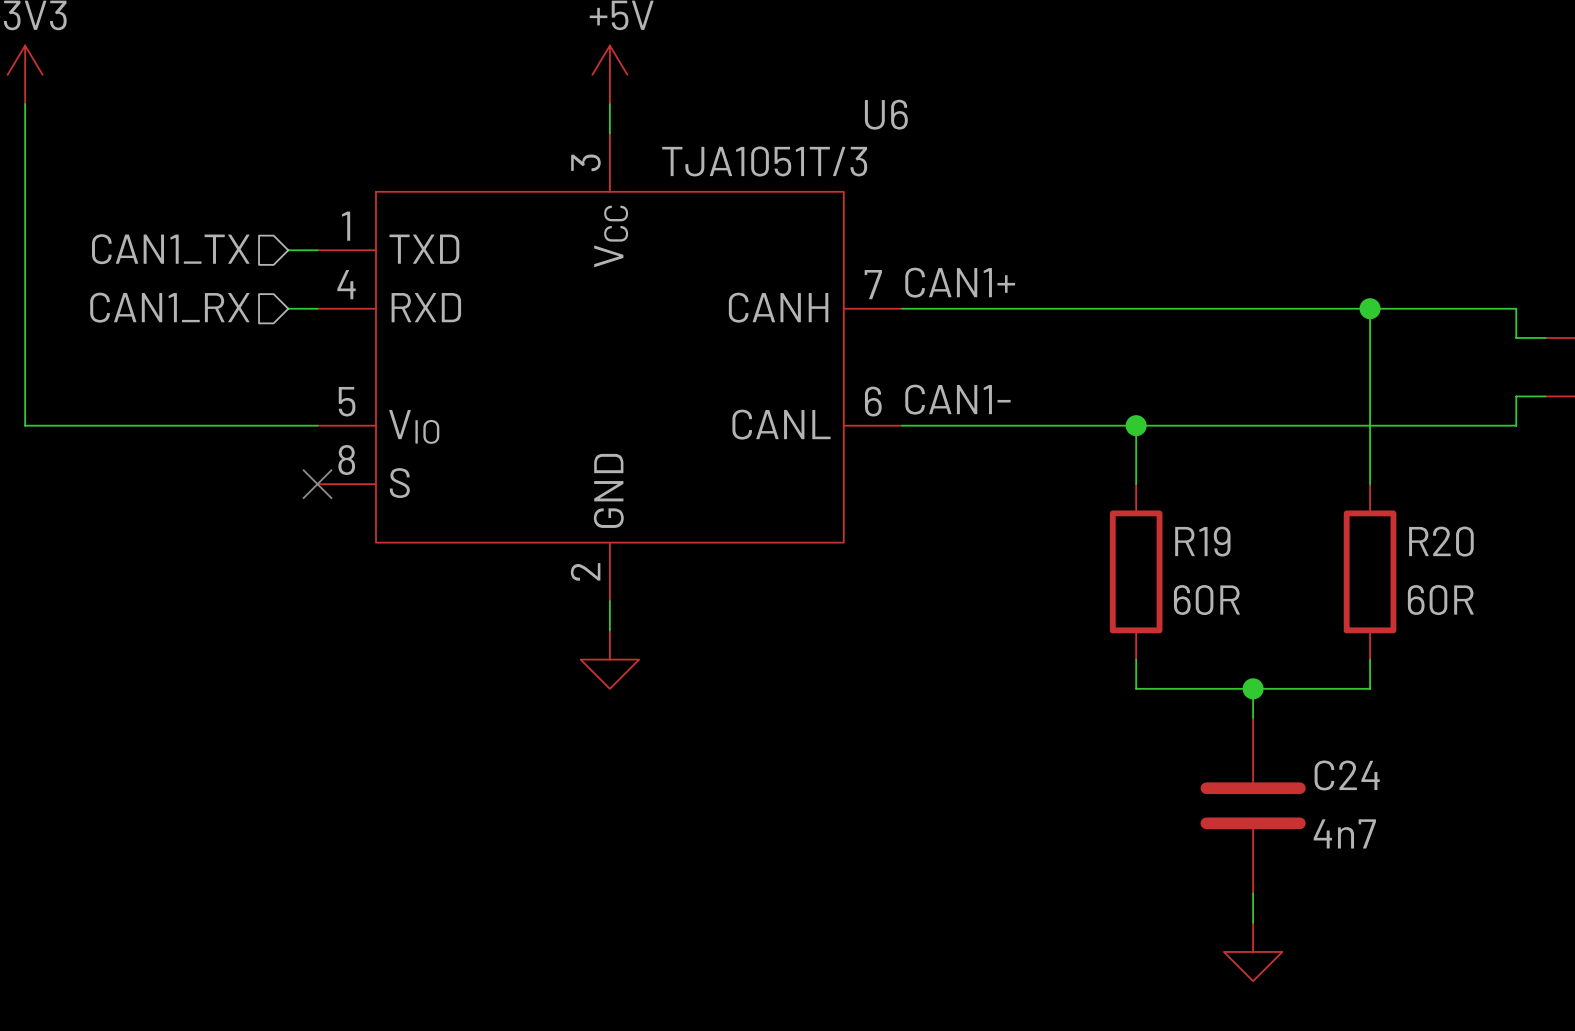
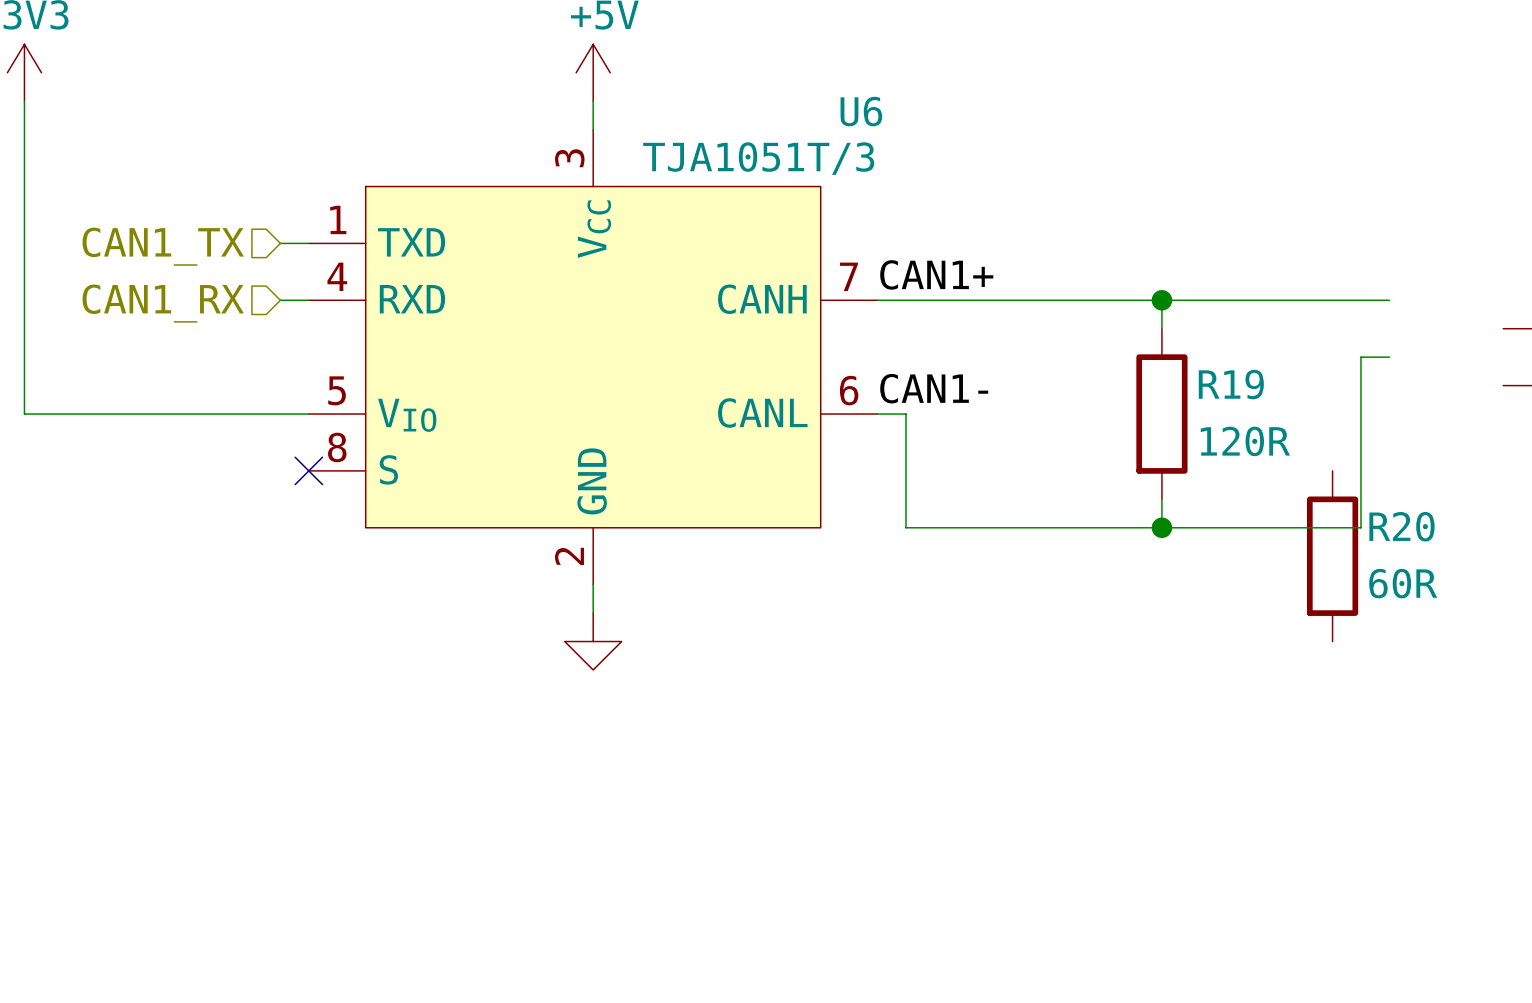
junction: none -> (1161, 300)
wire: (1370, 308) (1370, 484) -> none
junction: (1370, 308) -> none
wire: (1428, 308) (1516, 308) (1516, 337) (1545, 337) -> none
wire: (1545, 396) (1516, 396) (1516, 425) (931, 425) -> (1389, 357) (1361, 357) (1361, 527) (906, 527) (906, 414)
wire: (1136, 425) (1136, 484) -> none
junction: (1136, 425) -> none
junction: none -> (1161, 527)
R19 position: (1136, 571) -> (1161, 414)
R19 value: 60R (1206, 600) -> 120R (1245, 441)
wire: (1136, 659) (1136, 688) (1370, 688) (1370, 659) -> none
wire: (1253, 688) (1253, 718) -> (1161, 300) (1161, 328)
junction: (1253, 688) -> none
C24: 4n7 (1253, 805) -> none
wire: (1253, 893) (1253, 922) -> (1161, 499) (1161, 527)
power symbol: (1253, 951) -> none

